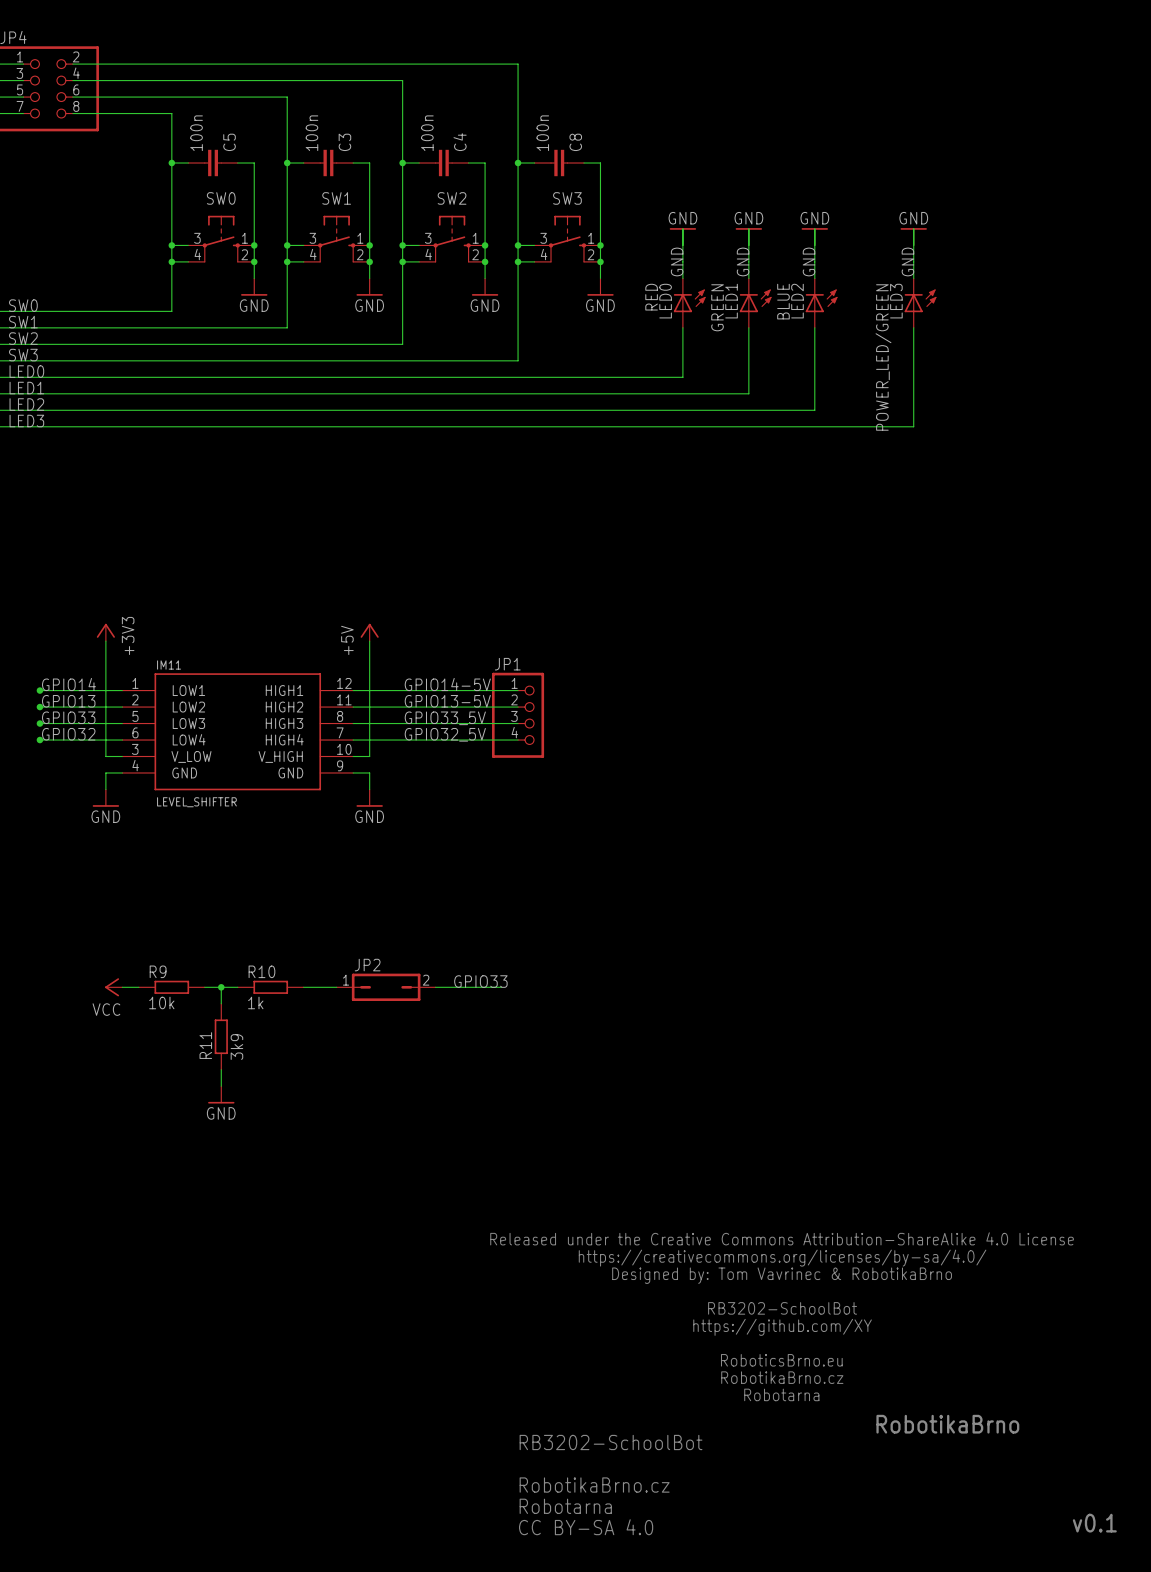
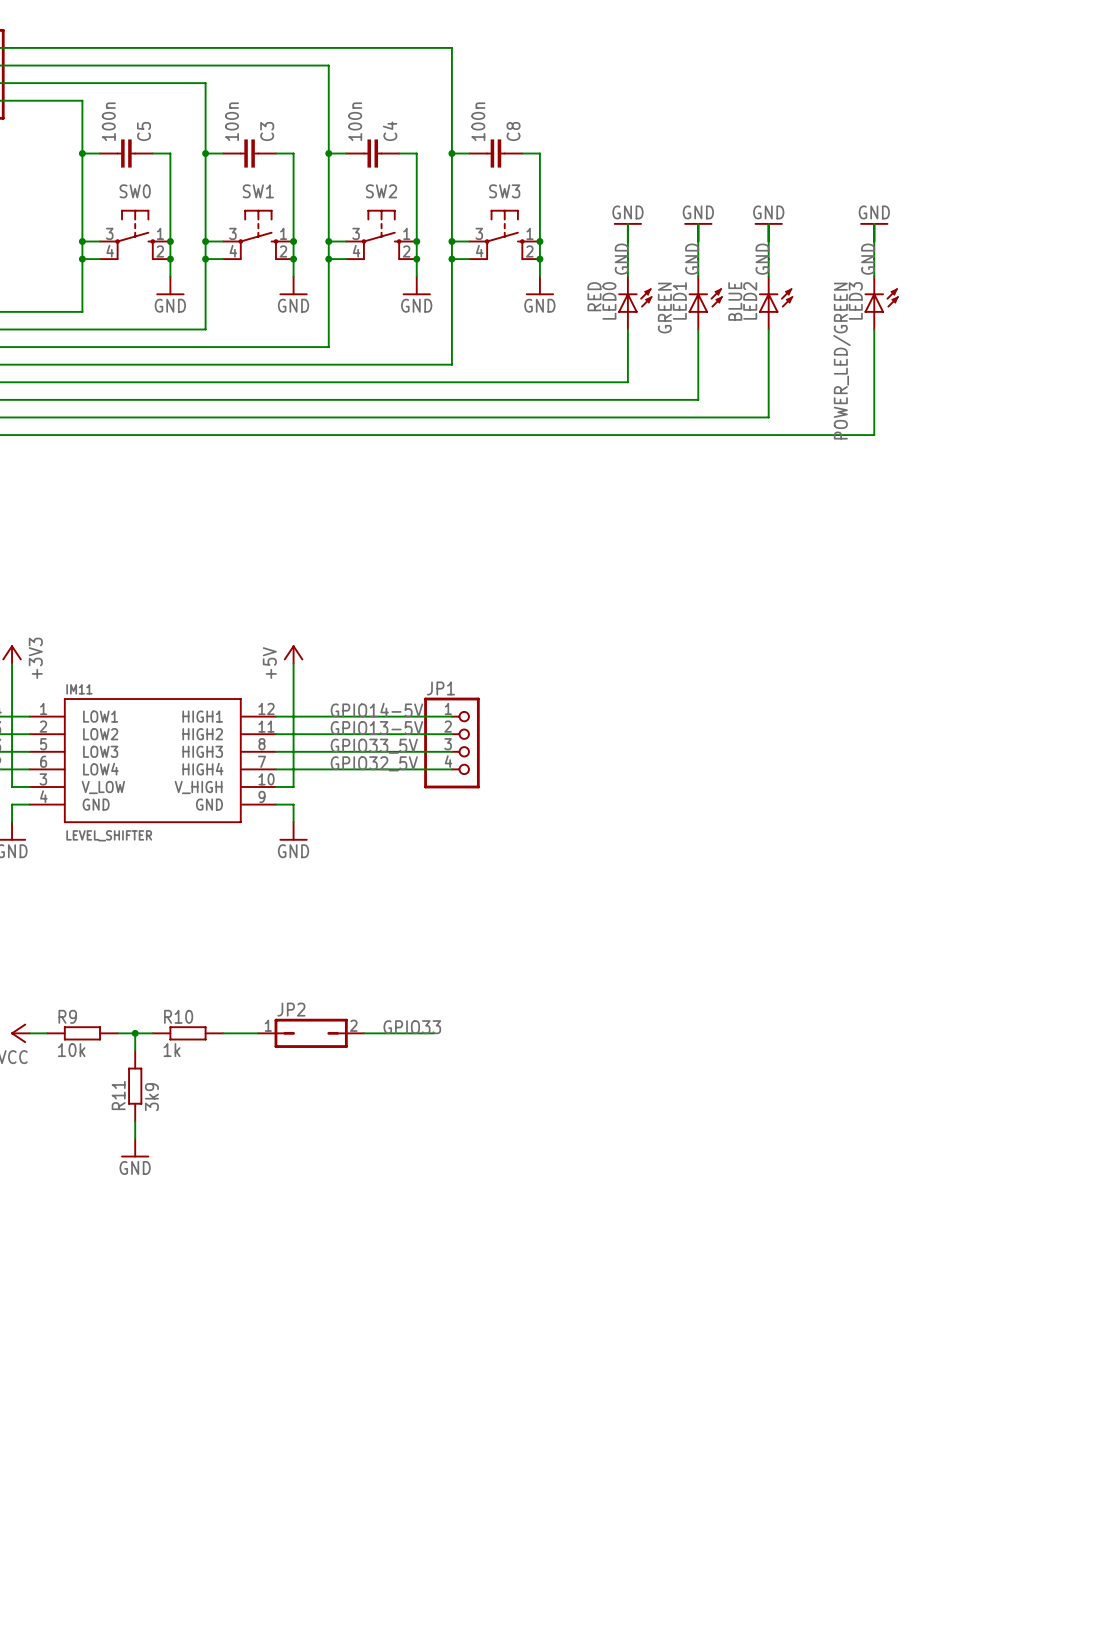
text: Released under the Creative Commons Attribution-ShareAlike 4.0 License (782, 1238) -> none
text: https://creativecommons.org/licenses/by-sa/4.0/ (782, 1258) -> none
text: Designed by: Tom Vavrinec & RobotikaBrno (782, 1275) -> none
text: RB3202-SchoolBot (782, 1308) -> none
text: https://github.com/XY (782, 1327) -> none
text: RoboticsBrno.eu (781, 1360) -> none
text: RobotikaBrno.cz (782, 1377) -> none
text: Robotarna (781, 1394) -> none
text: RobotikaBrno (947, 1424) -> none
text: RB3202-SchoolBot (611, 1442) -> none
text: RobotikaBrno.cz (594, 1485) -> none
text: Robotarna (565, 1506) -> none
text: v0.1 (1094, 1523) -> none
text: CC BY-SA 4.0 (586, 1527) -> none

